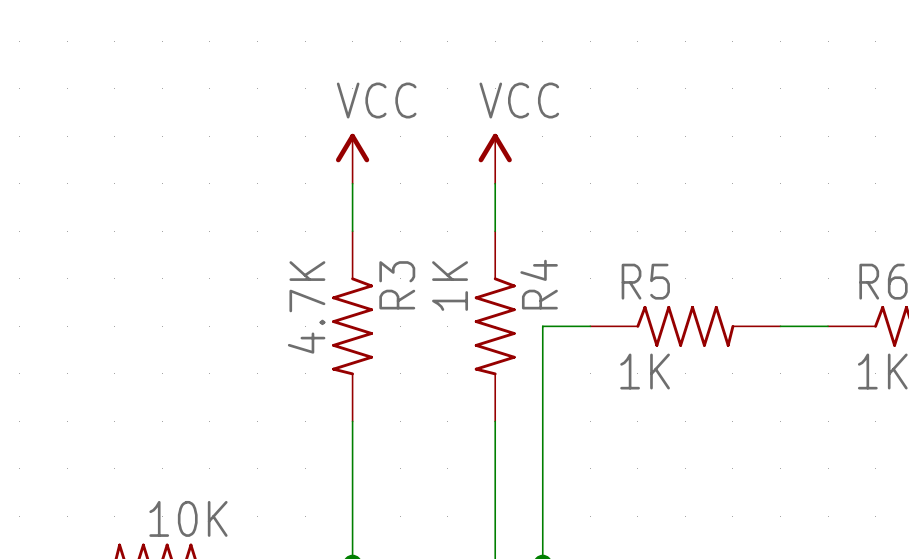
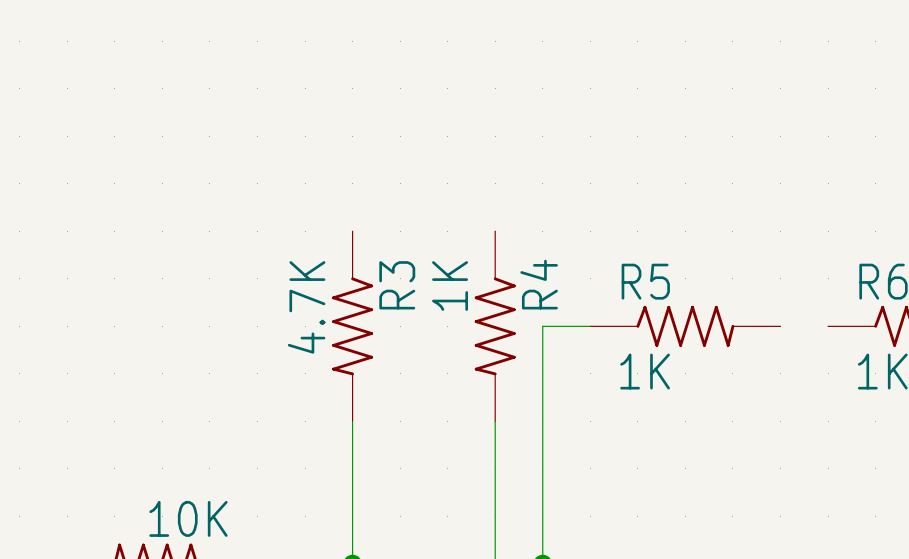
power symbol: VCC (352, 158) -> none
power symbol: VCC (495, 158) -> none
wire: (352, 183) (352, 231) -> none
wire: (495, 183) (495, 231) -> none
wire: (780, 326) (828, 326) -> none

